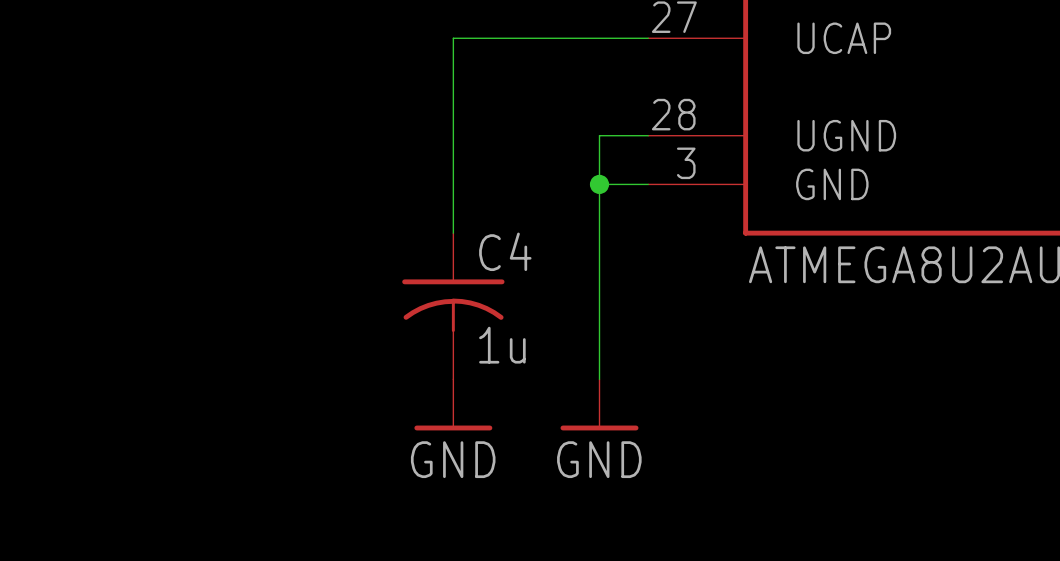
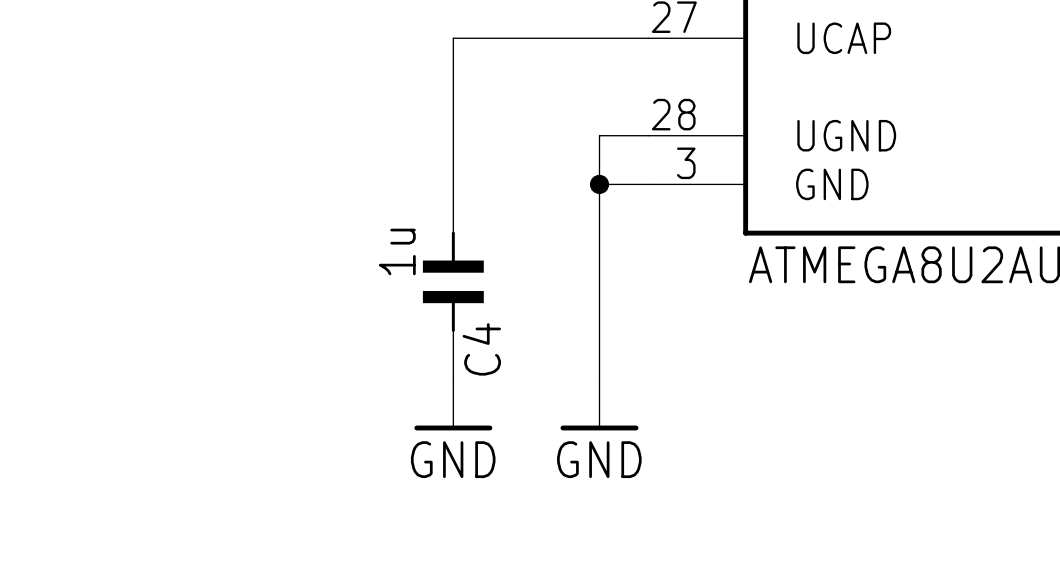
C4 symbol: [402, 233, 505, 380] -> [422, 231, 484, 333]
C4 name position: C4 (505, 251) -> C4 (481, 349)
C4 value position: 1u (502, 345) -> 1u (397, 251)

